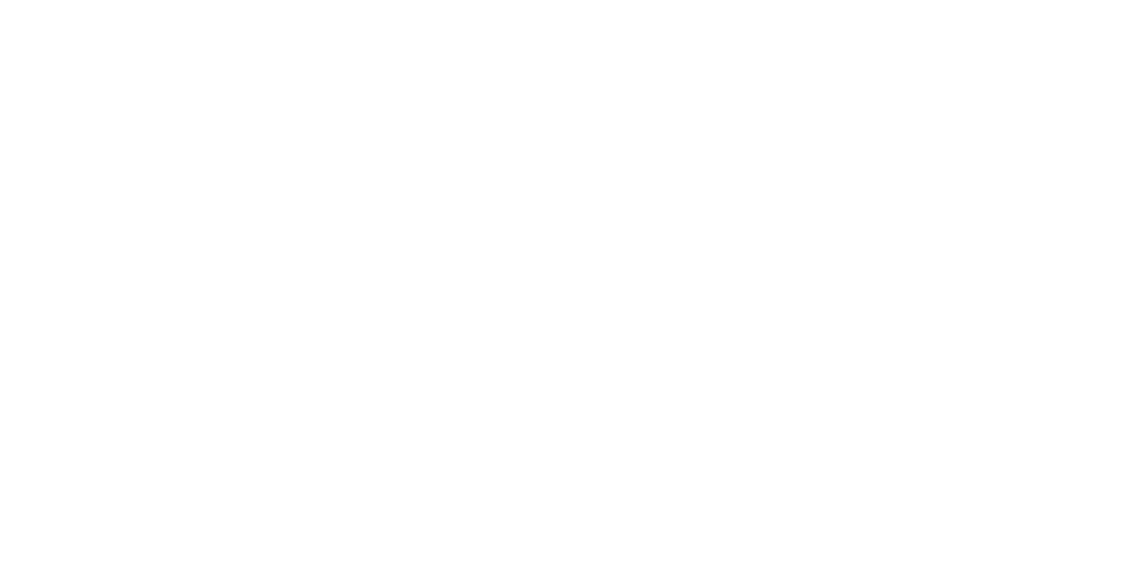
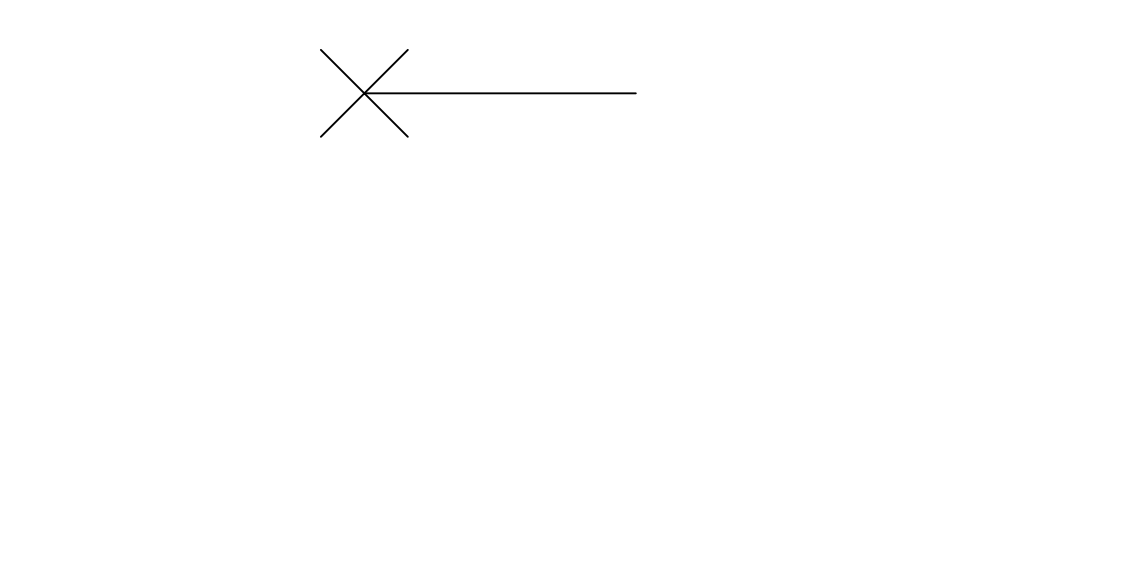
wire: none -> (364, 93) (635, 93)
no-connect mark: none -> (364, 93)

